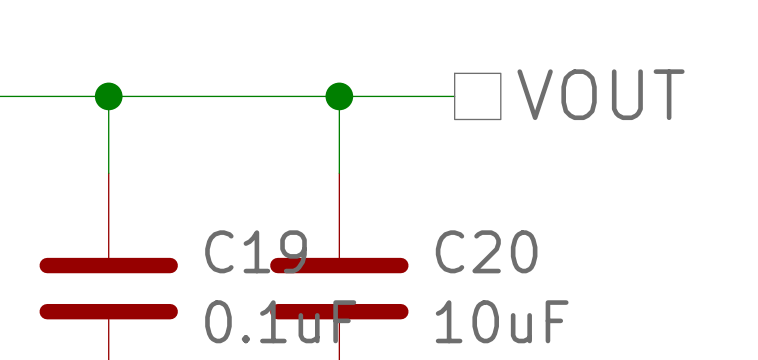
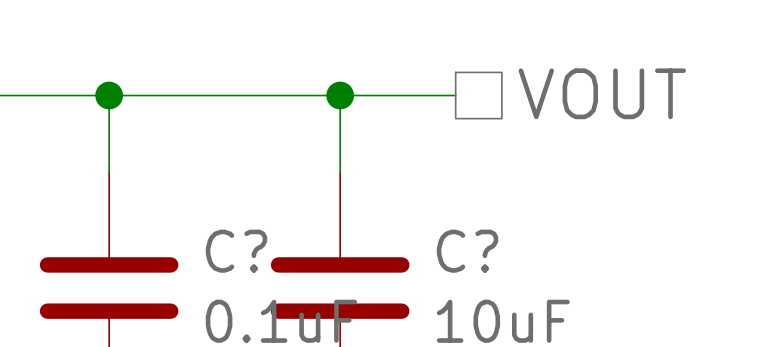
C19 name: C19 (255, 251) -> C? (236, 251)
C20 name: C20 (486, 251) -> C? (467, 251)

